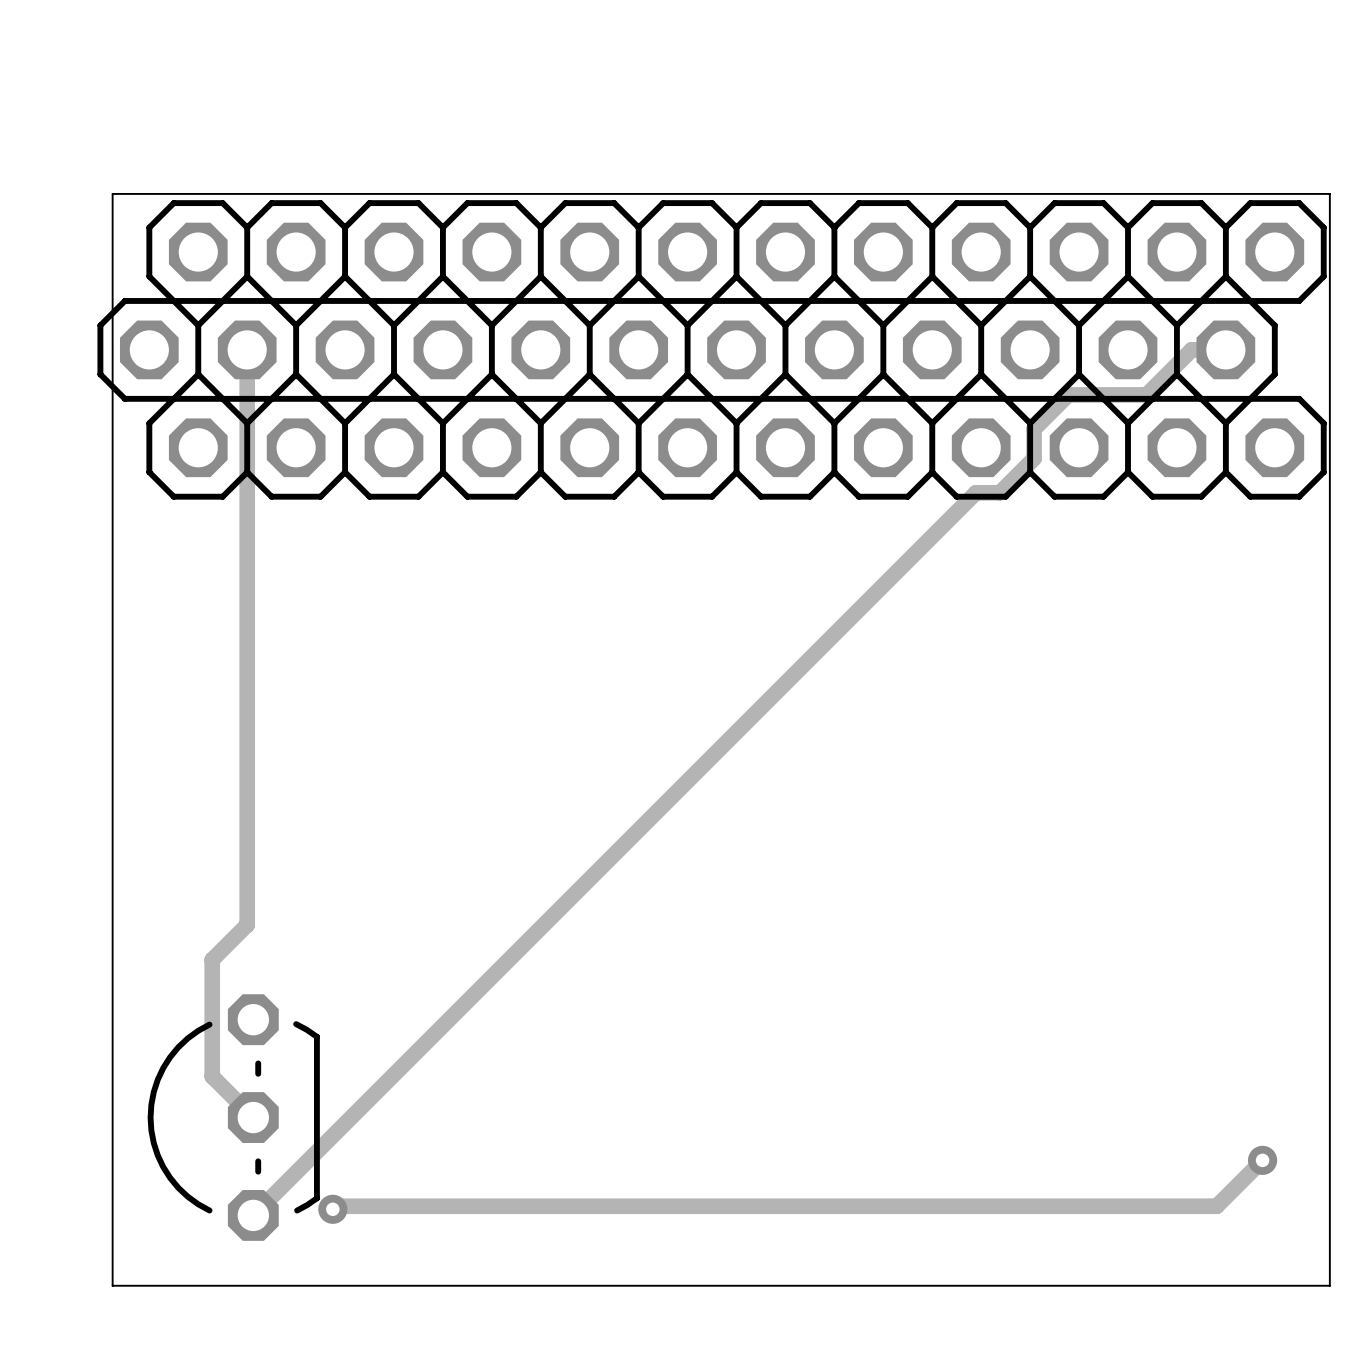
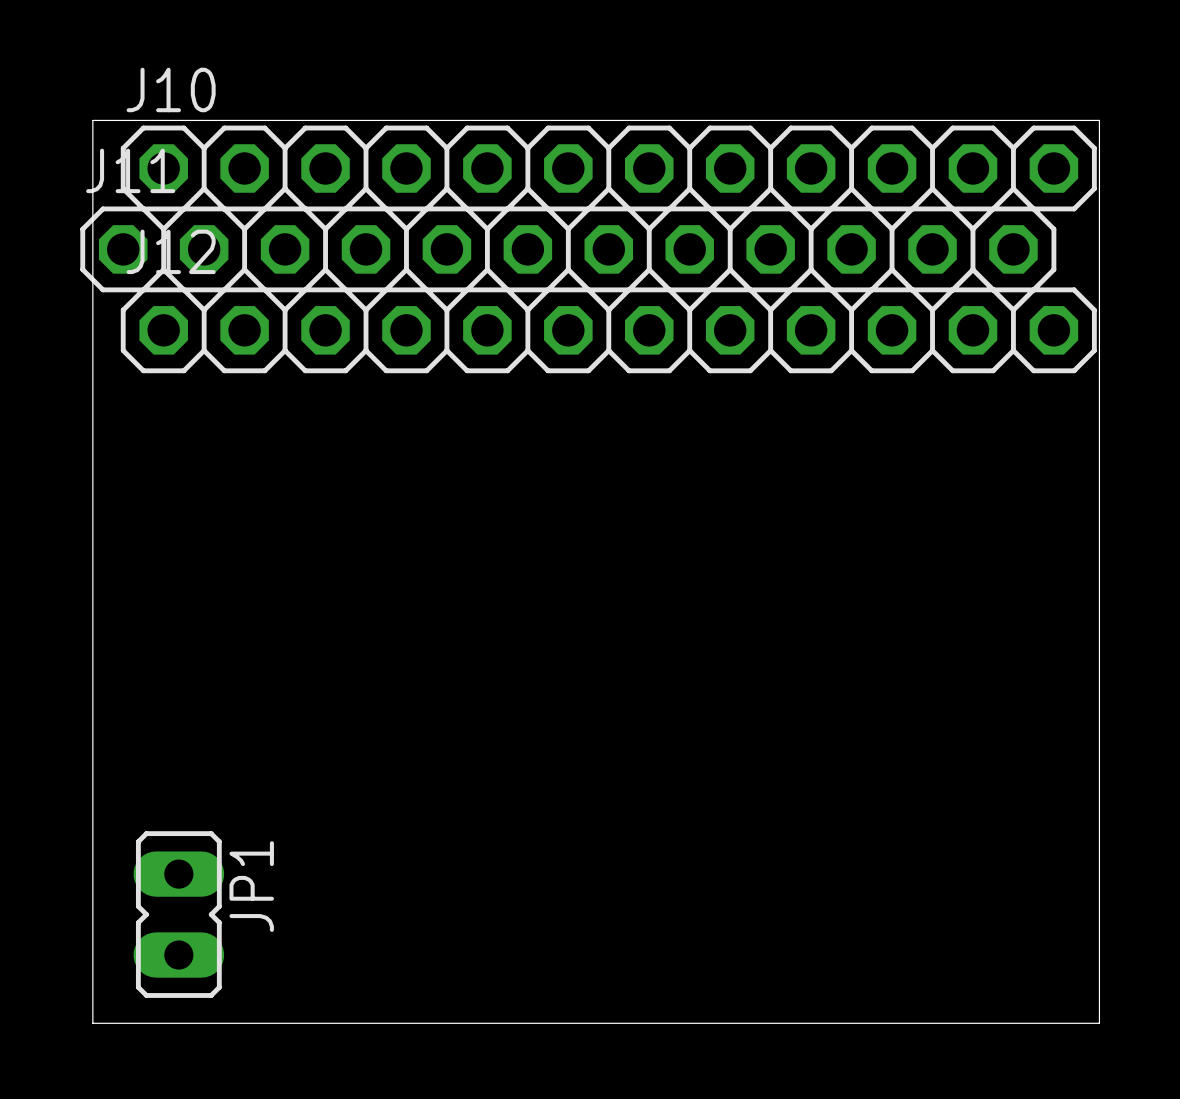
J10 name: none -> J10 (171, 89)
J11 name: none -> J11 (130, 170)
track: (247, 349) (247, 924) (212, 959) (212, 1076) (253, 1117) -> none
track: (1225, 349) (1191, 349) (1146, 394) (1068, 394) (1034, 429) (1034, 458) (999, 492) (975, 492) (253, 1215) -> none
J12 name: none -> J12 (171, 251)
part: (233, 1117) -> none
JP1: none -> (178, 914)
track: (1262, 1160) (1216, 1206) (335, 1206) (332, 1209) -> none
via: (1262, 1160) -> none
via: (332, 1209) -> none

